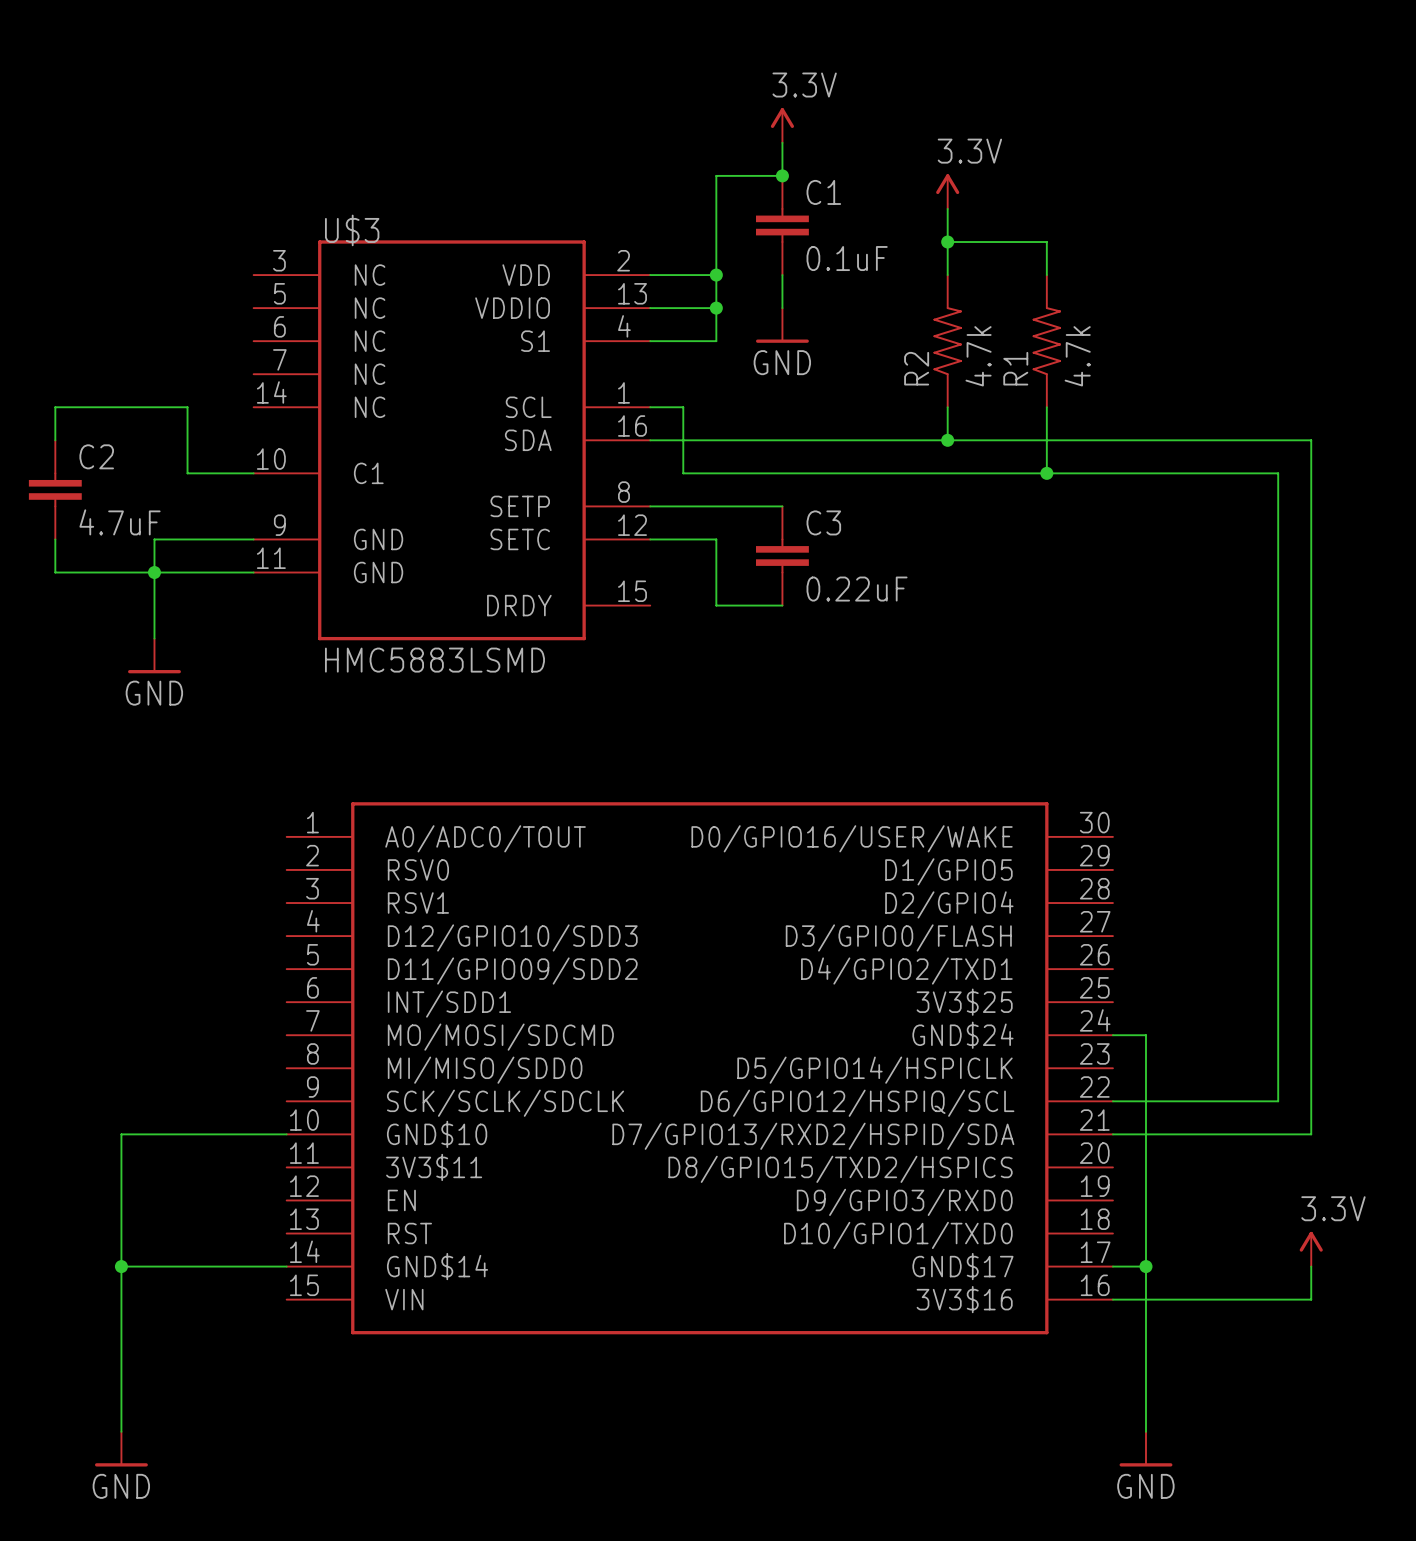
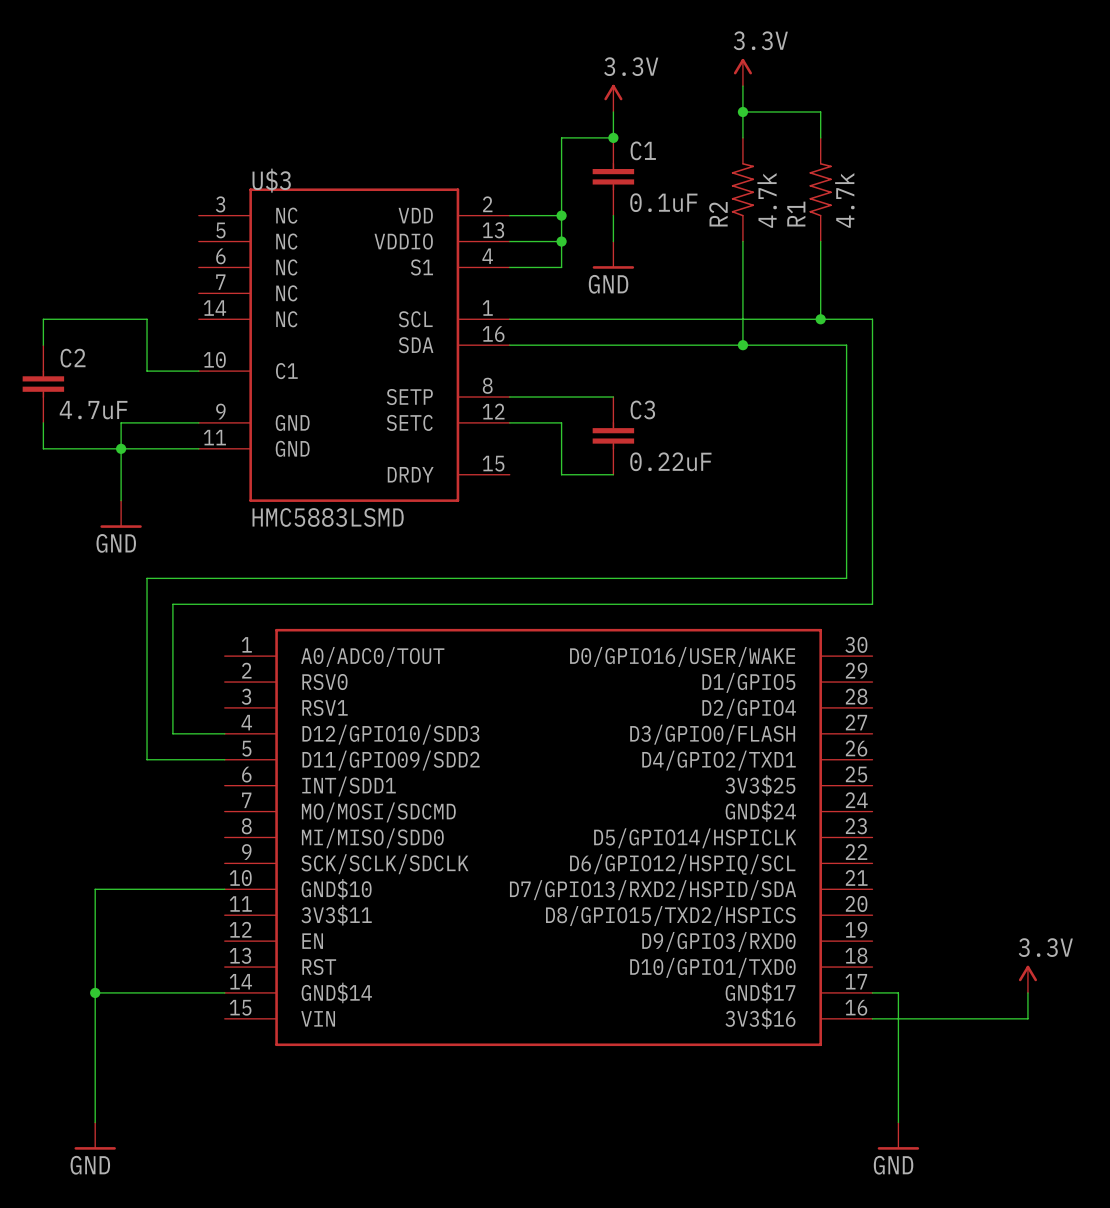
junction: none -> (742, 111)
power symbol position: 3.3V (947, 191) -> 3.3V (742, 72)
wire: (947, 208) (947, 275) -> (742, 86) (742, 137)
wire: (947, 242) (1046, 242) (1046, 275) -> (742, 111) (820, 111) (820, 137)
junction: (947, 242) -> none
wire: none -> (742, 241) (742, 319)
R2 position: (947, 341) -> (742, 189)
R1 position: (1046, 341) -> (820, 189)
wire: (683, 407) (683, 473) (1278, 473) (1278, 1101) (1112, 1101) -> (535, 319) (872, 319) (872, 604) (172, 604) (172, 733) (224, 733)
wire: (1046, 407) (1046, 473) -> (820, 319) (820, 241)
wire: (1079, 440) (1311, 440) (1311, 1134) (1112, 1134) -> (846, 345) (846, 578) (147, 578) (147, 759) (224, 759)
junction position: (1046, 473) -> (820, 319)
wire: (1112, 1035) (1145, 1035) (1145, 1266) -> none
junction: (1145, 1266) -> none

